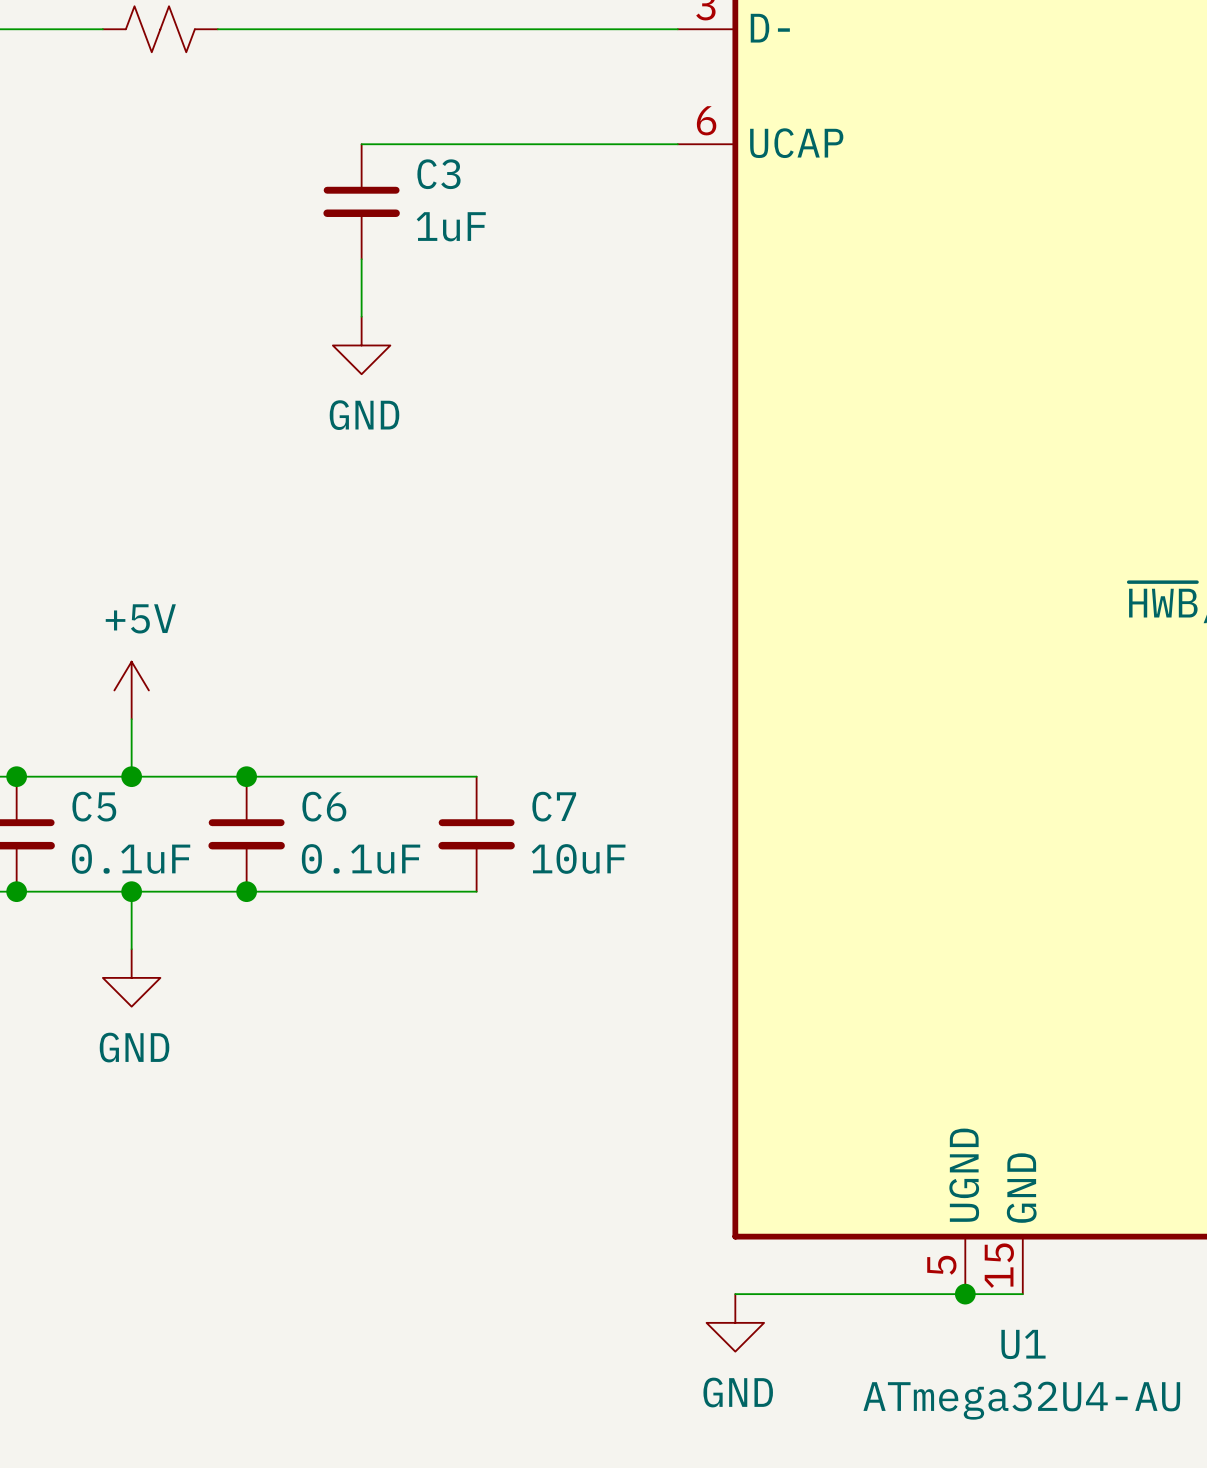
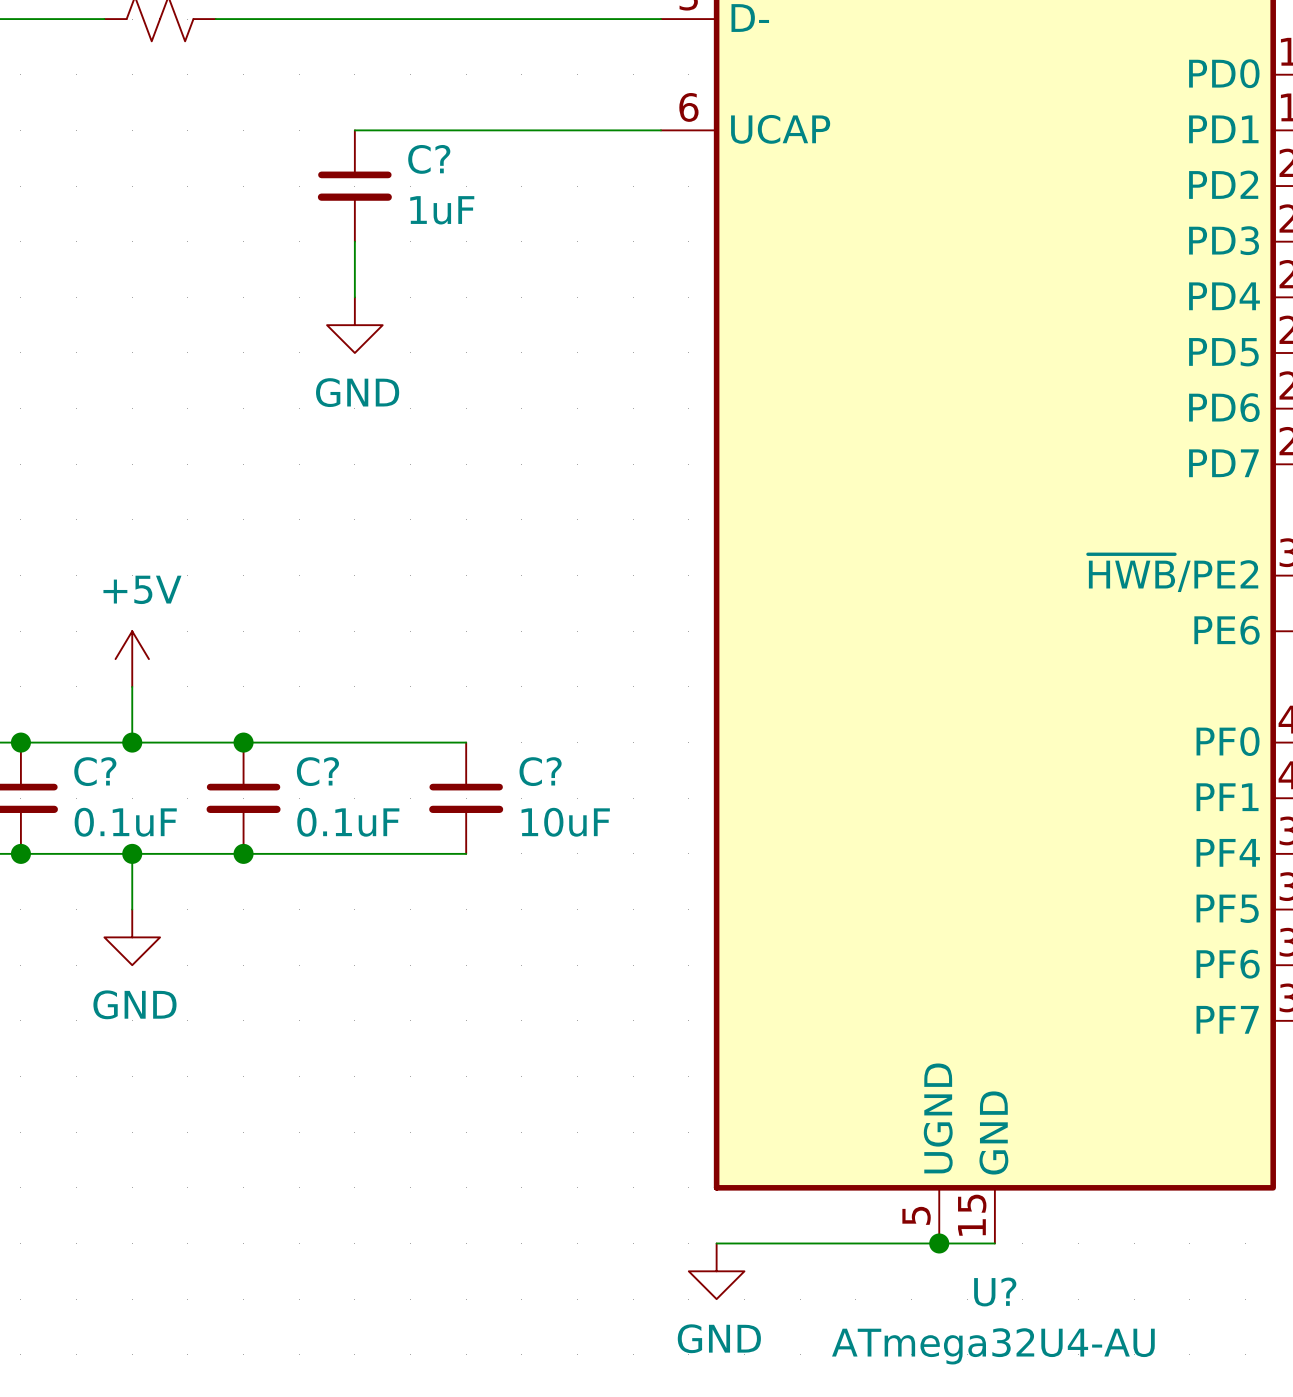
C3 name: C3 (438, 174) -> C? (429, 159)
C5 name: C5 (94, 806) -> C? (95, 771)
C6 name: C6 (324, 806) -> C? (317, 771)
C7 name: C7 (554, 806) -> C? (540, 771)
U1 name: U1 (1023, 1344) -> U? (995, 1291)

